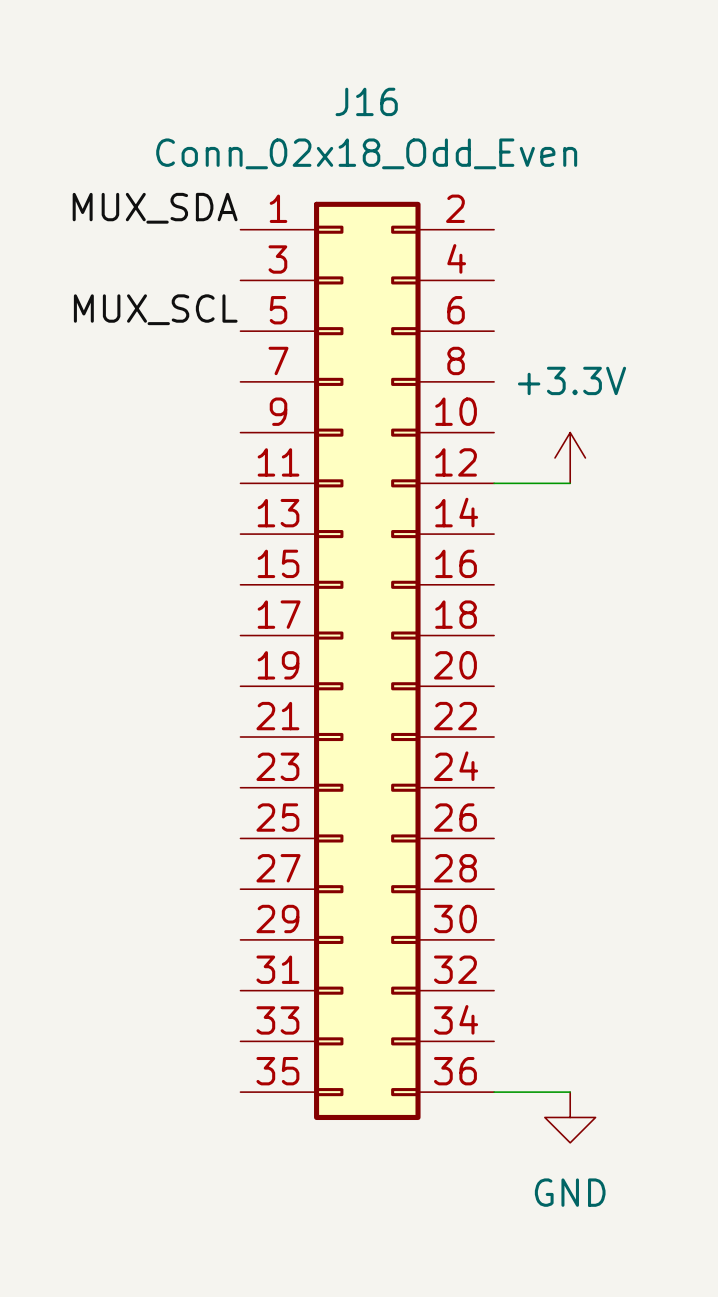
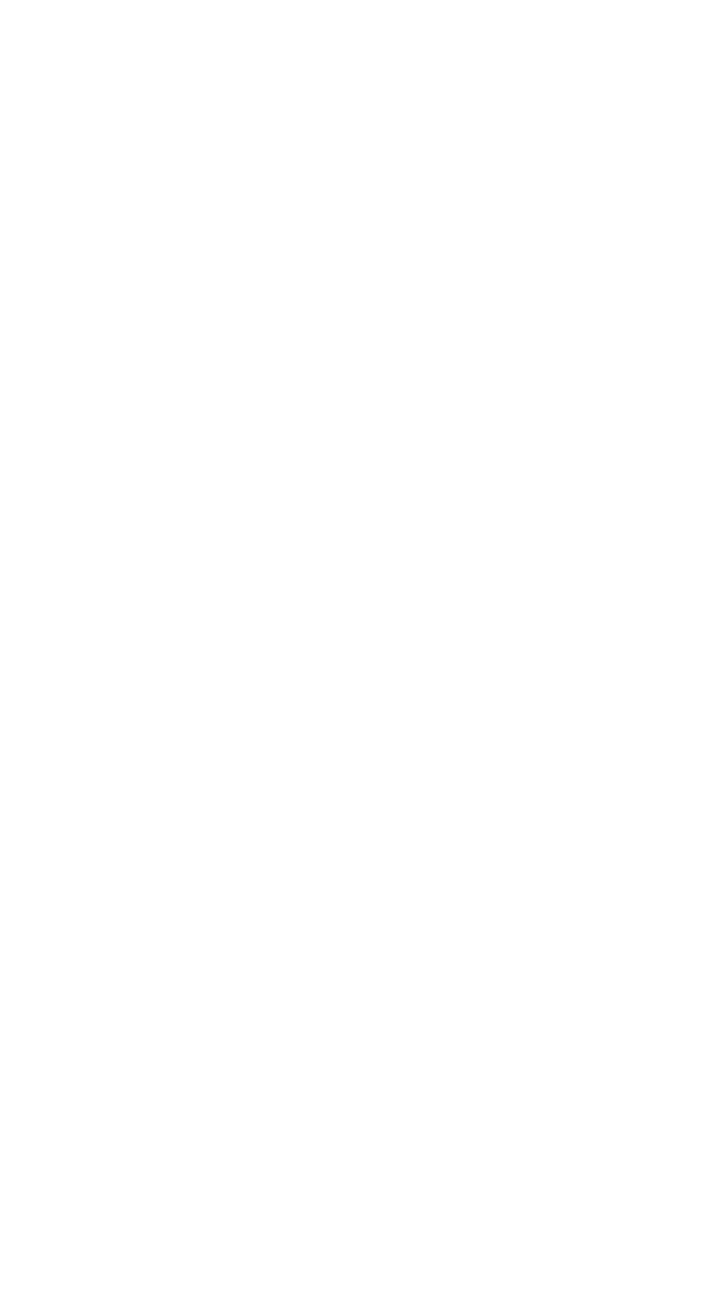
label: MUX_SDA (155, 208) -> none
label: MUX_SCL (155, 309) -> none
power symbol: +3.3V (570, 457) -> none
wire: (494, 483) (570, 483) -> none
J16: Conn_02x18_Odd_Even (367, 660) -> none
wire: (494, 1092) (570, 1092) -> none
power symbol: GND (570, 1117) -> none

